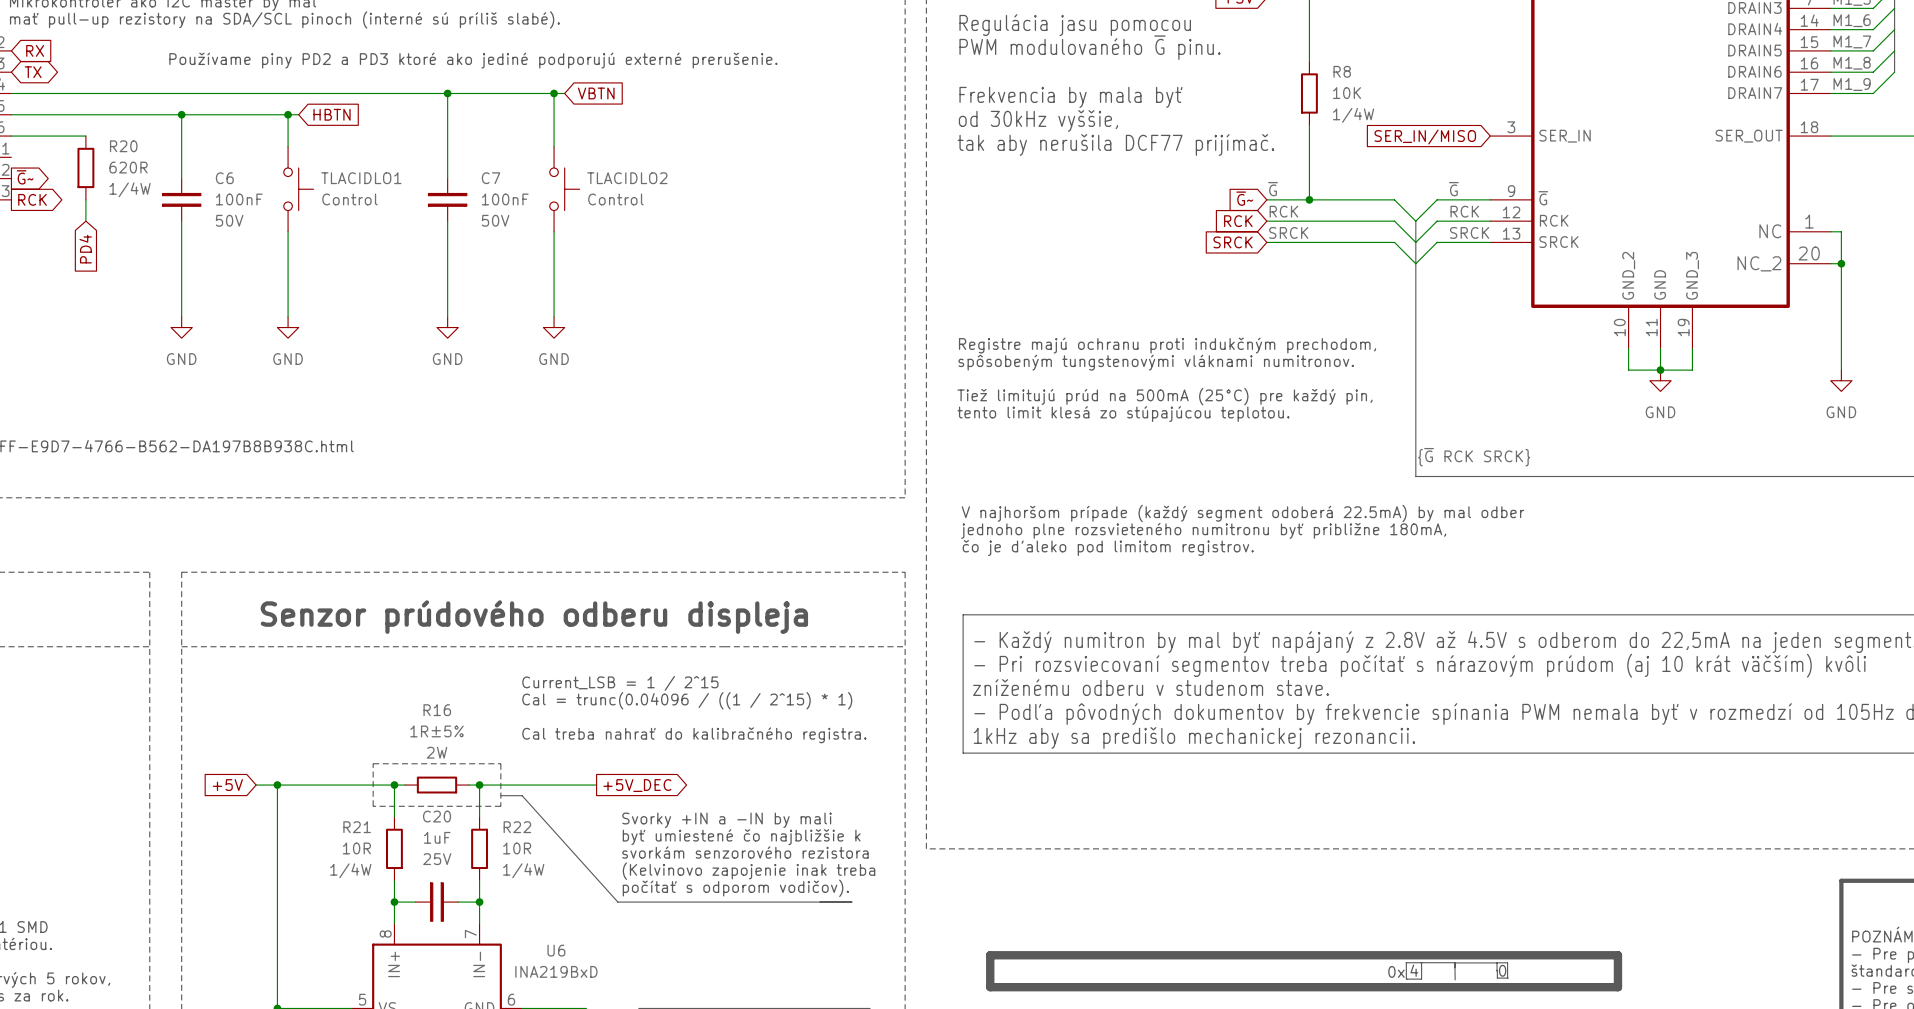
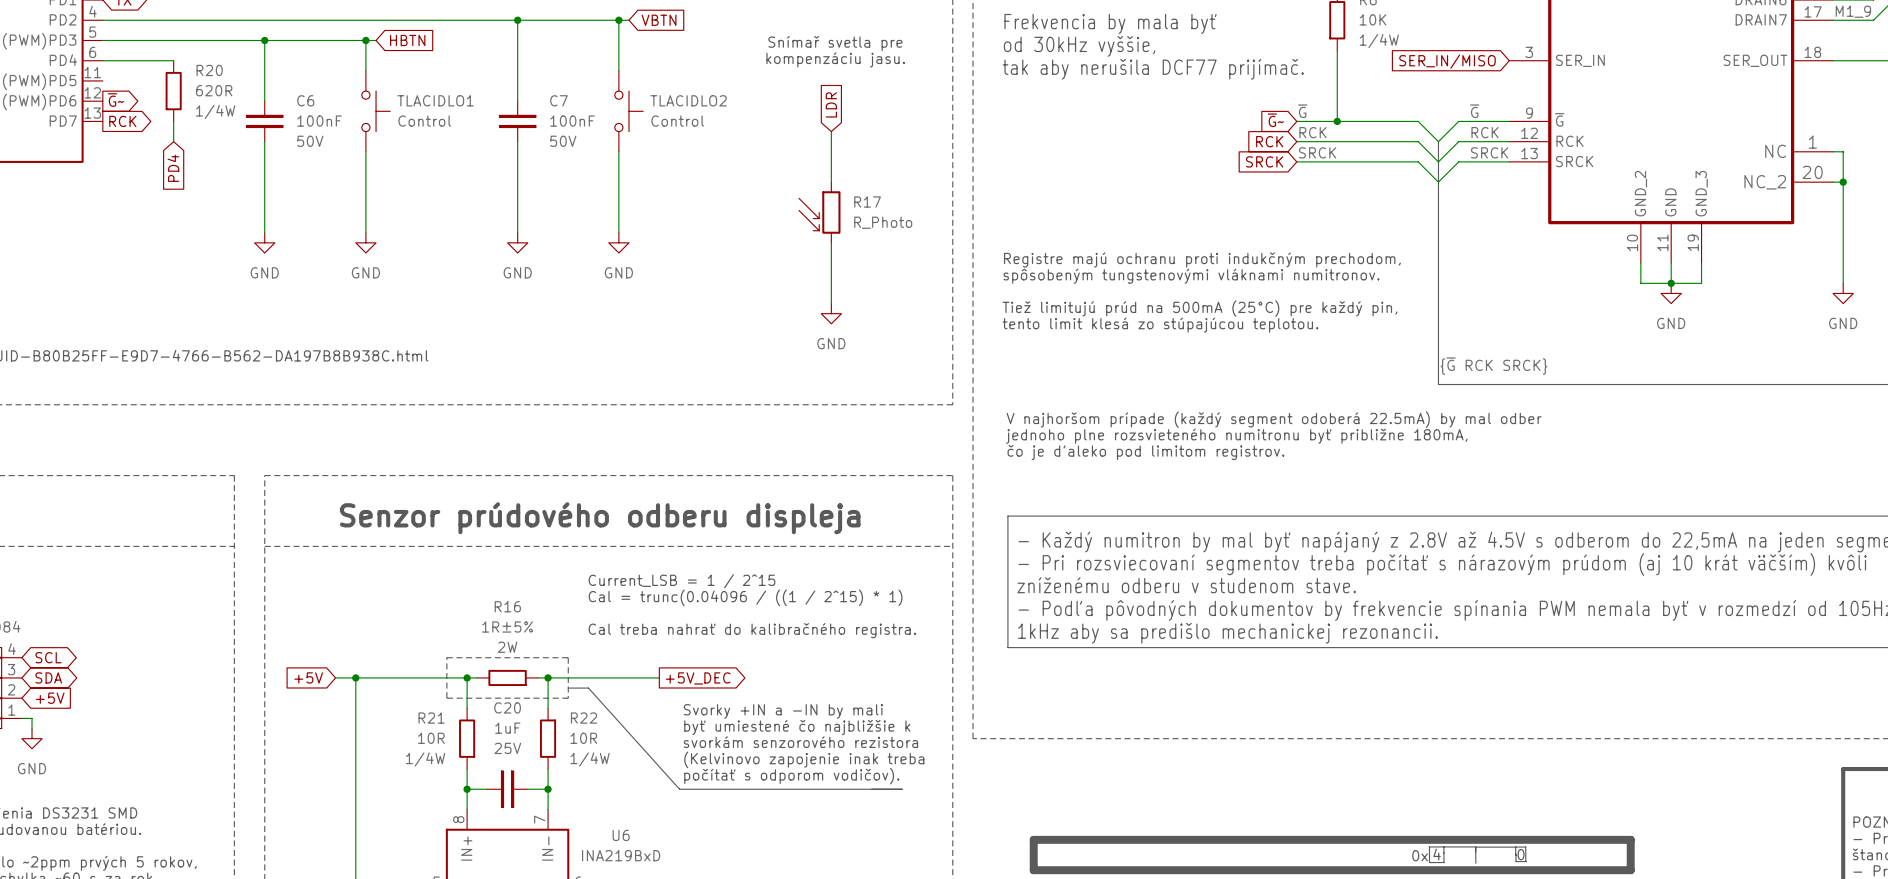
text: none -> Snímař svetla pre (835, 43)
text: none -> kompenzáciu jasu. (835, 59)
global label: none -> LDR (831, 104)
wire: none -> (831, 131) (831, 182)
R17: none -> R_Photo (819, 212)
wire: none -> (831, 242) (831, 303)
power symbol: none -> GND (831, 313)

